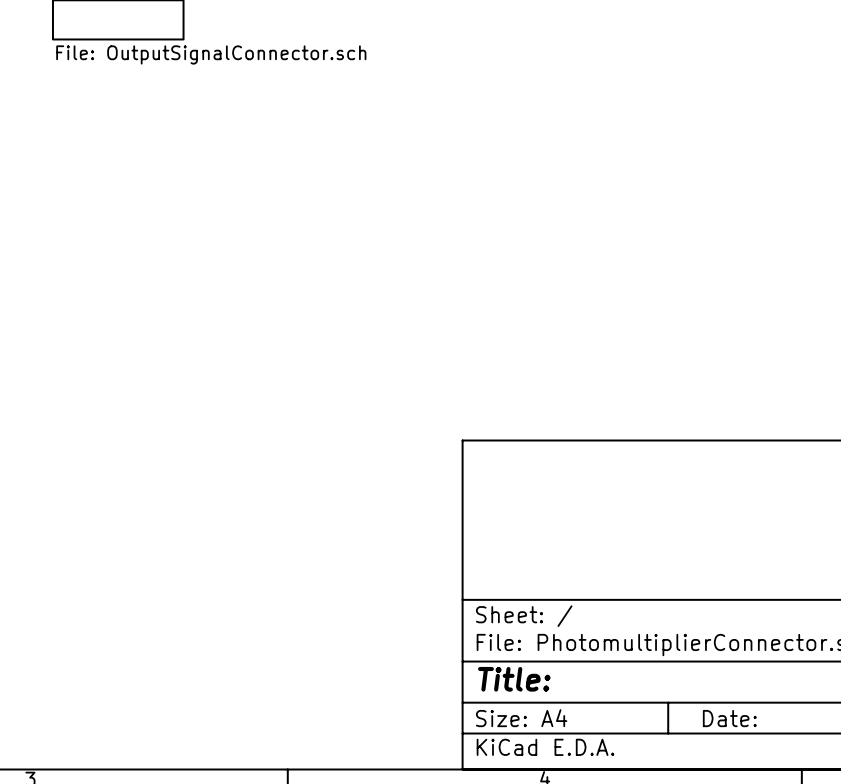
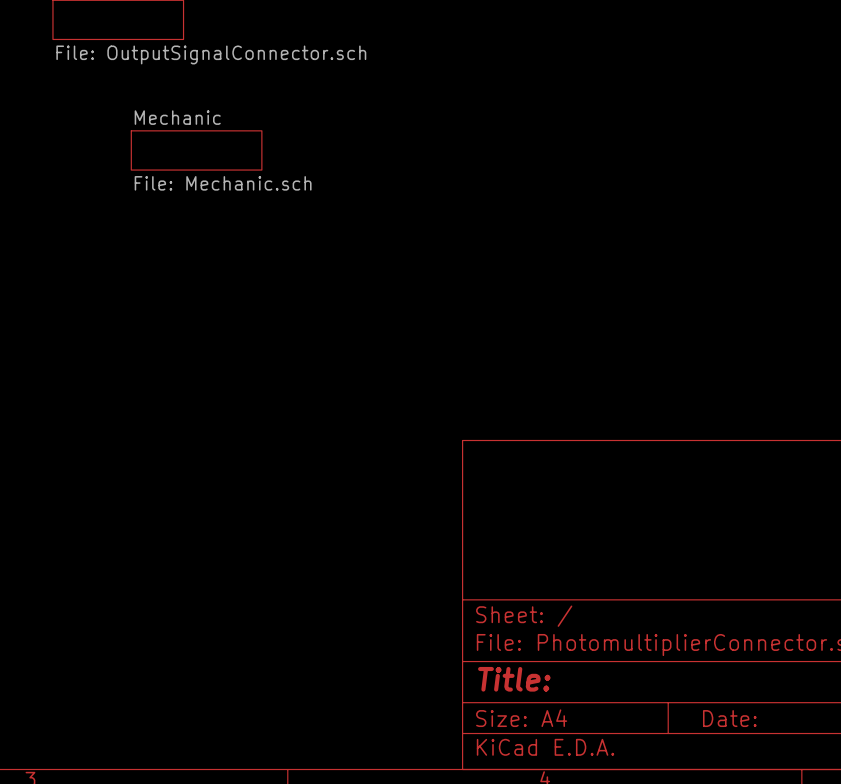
sheet Mechanic: none -> File: Mechanic.sch (196, 150)

